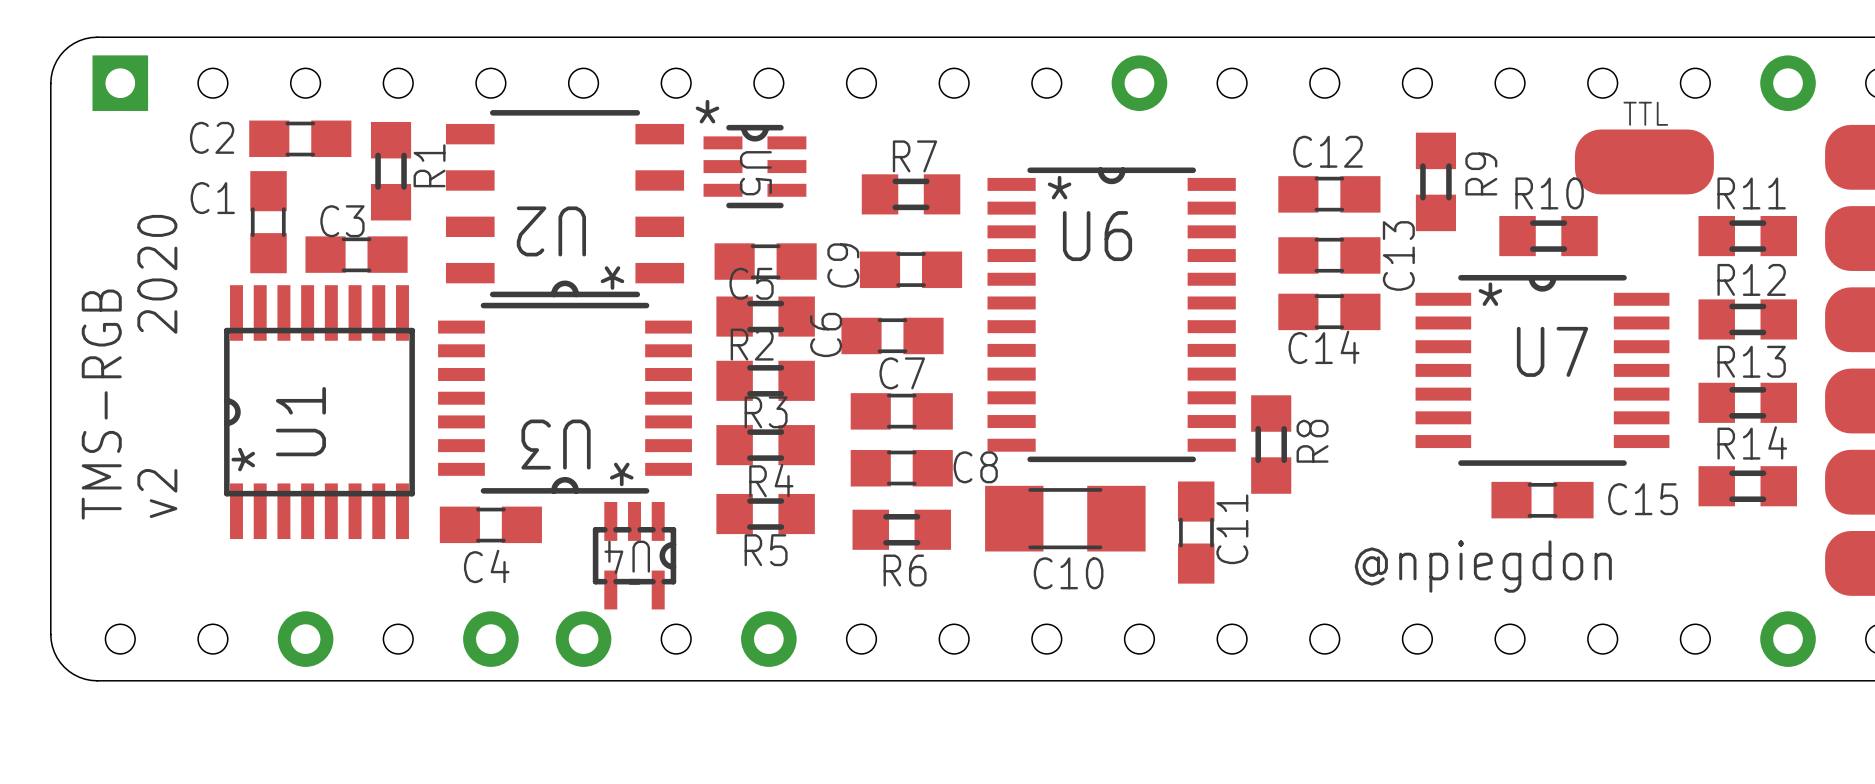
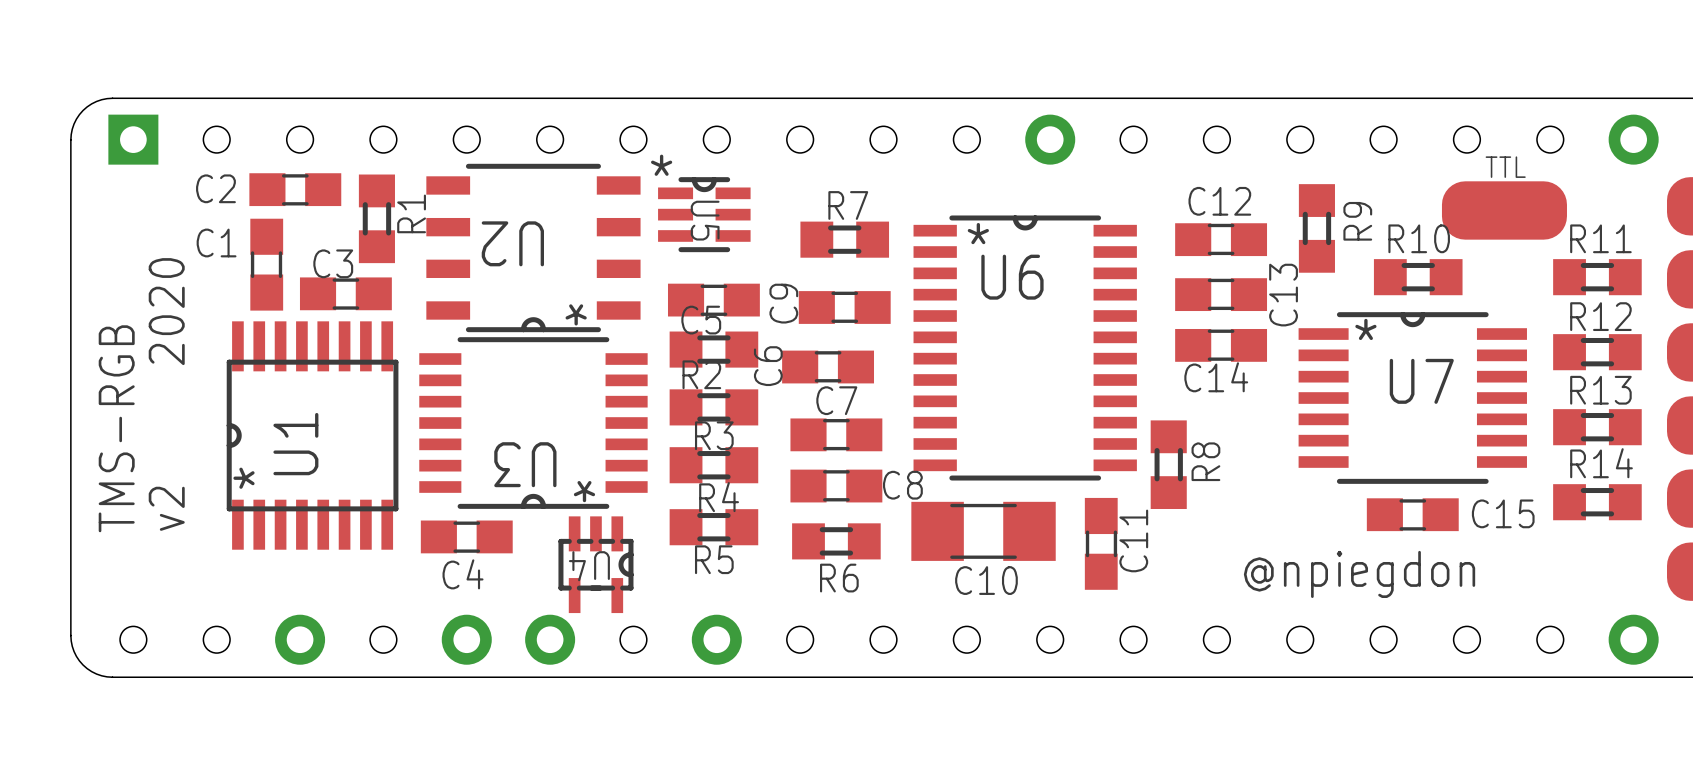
U2 name position: U2 (551, 231) -> U2 (512, 243)

